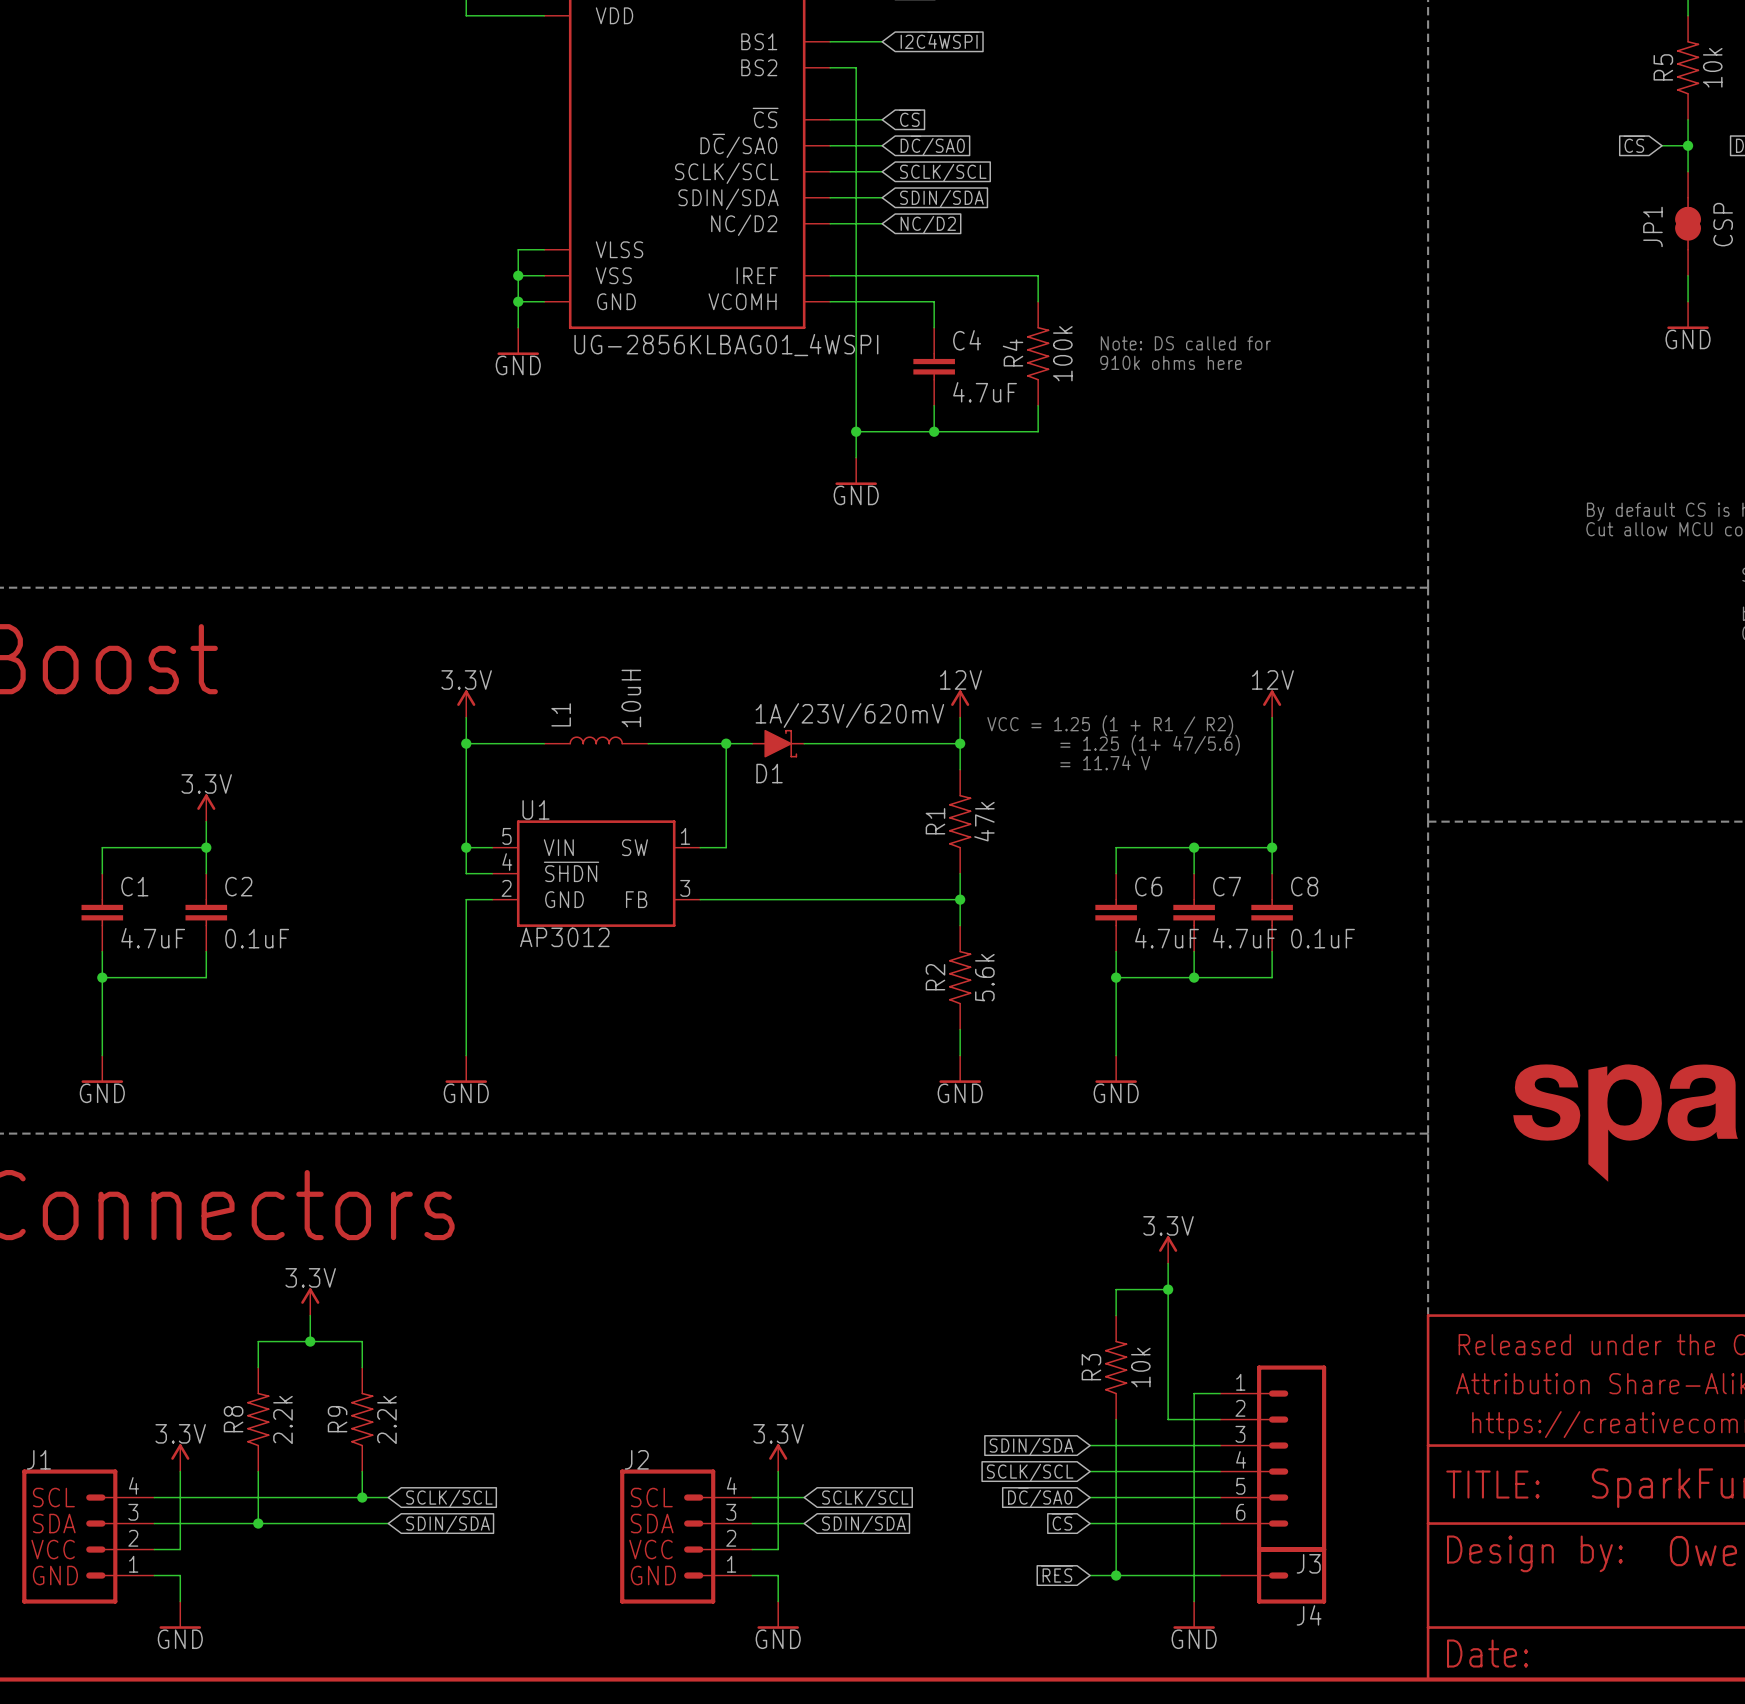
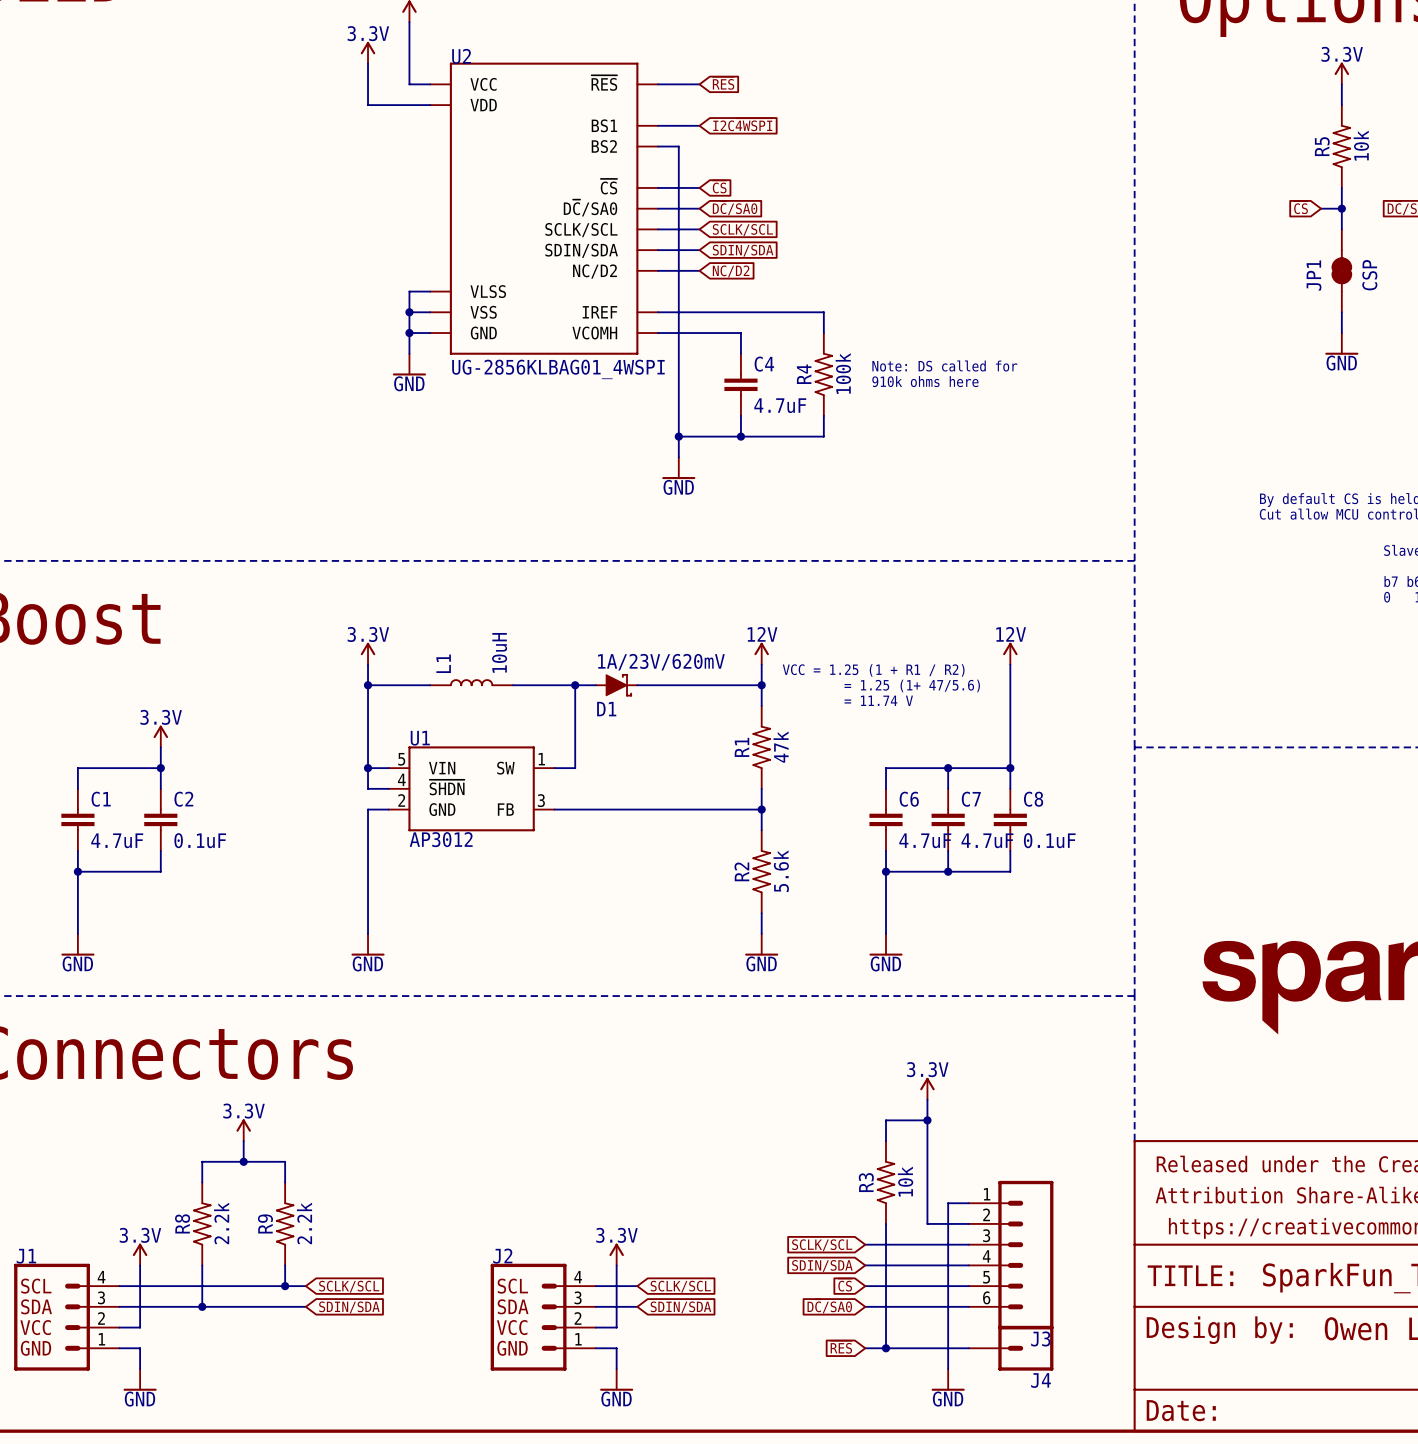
global label: SDIN/SDA (1031, 1446) -> SCLK/SCL (822, 1245)
global label: SCLK/SCL (1030, 1472) -> SDIN/SDA (822, 1265)
global label: D~{C}/SA0 (1040, 1497) -> ~{CS} (845, 1285)
global label: ~{CS} (1062, 1522) -> D~{C}/SA0 (829, 1306)

